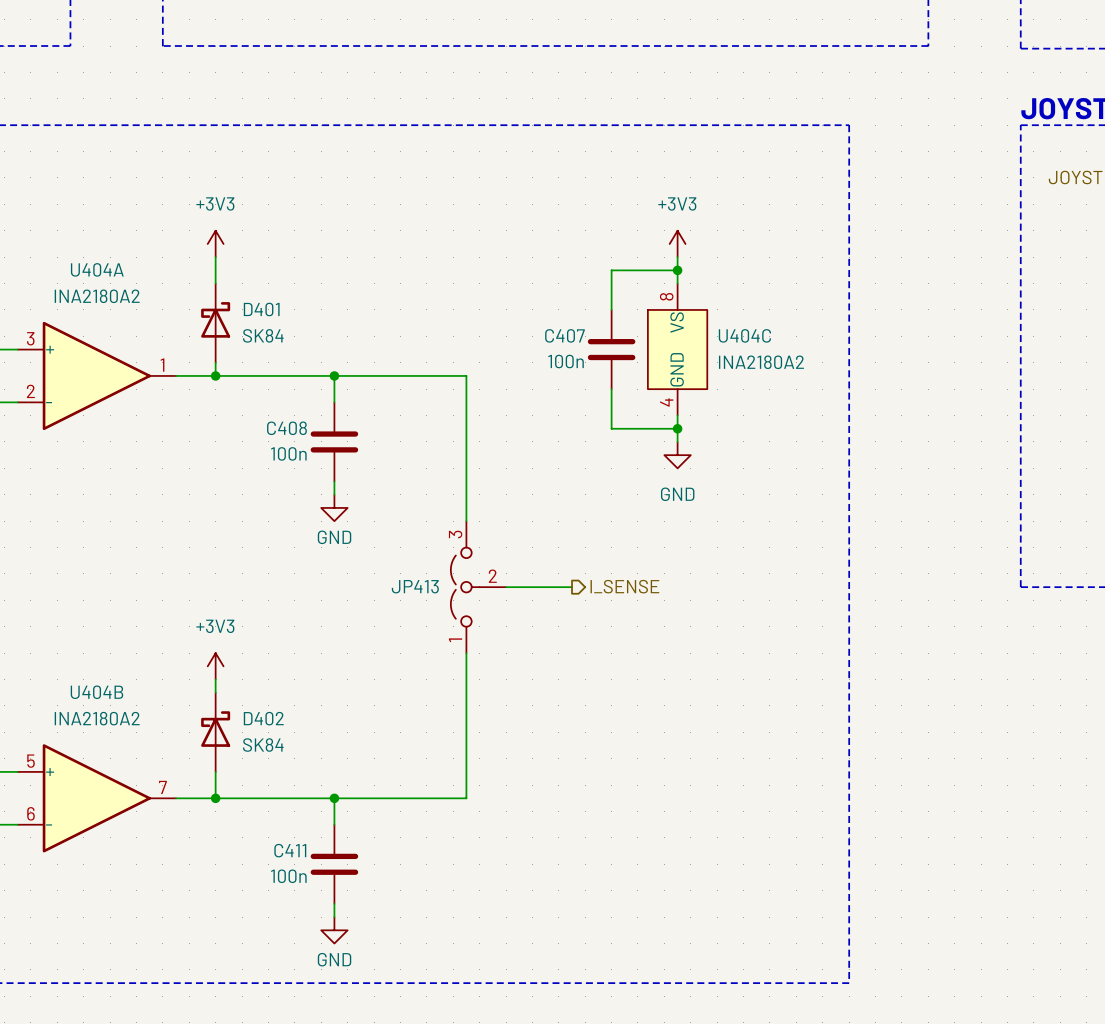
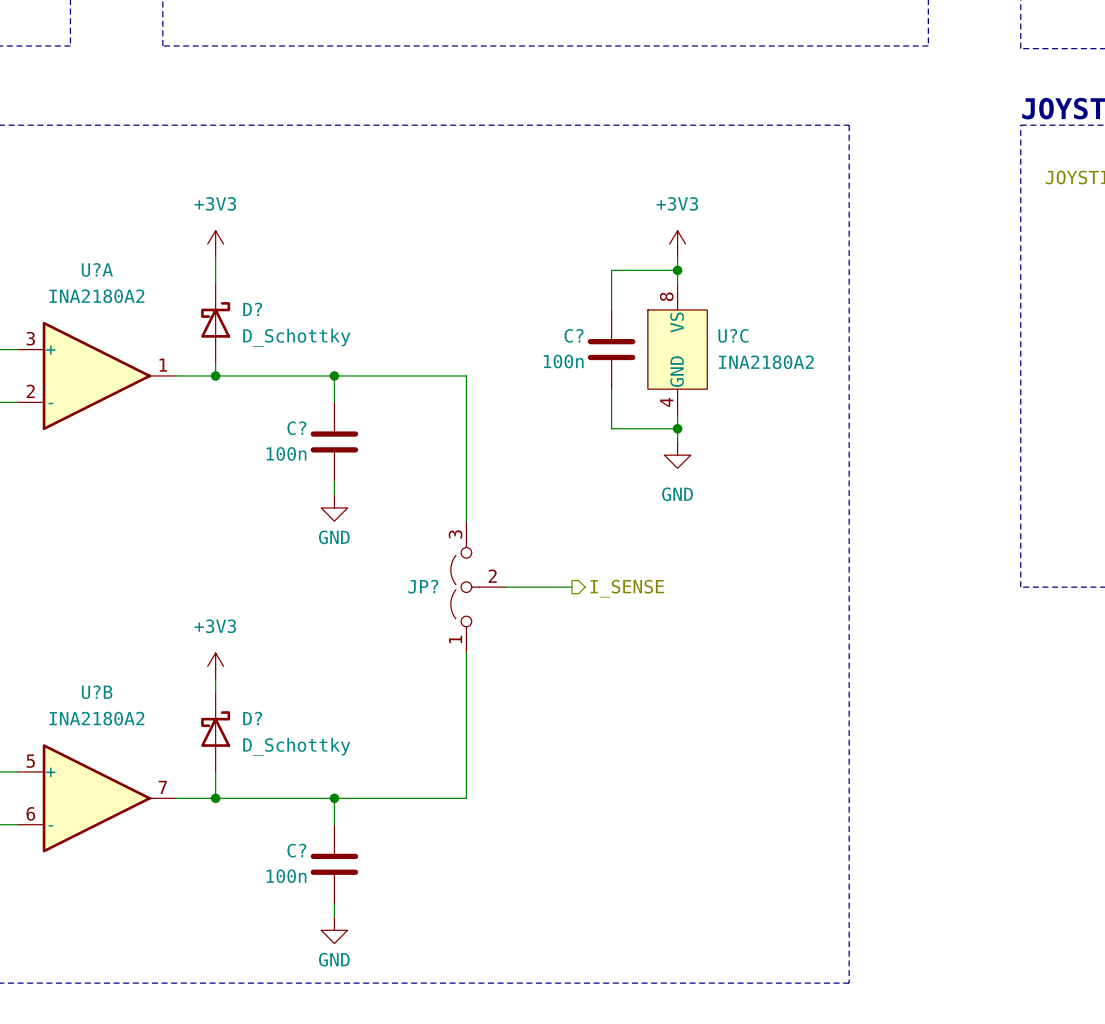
U404A name: U404A (97, 269) -> U?A (97, 269)
D401 name: D401 (261, 309) -> D? (252, 309)
D401 value: SK84 (263, 335) -> D_Schottky (296, 337)
C407 name: C407 (564, 335) -> C? (574, 335)
U404C name: U404C (744, 335) -> U?C (733, 335)
C408 name: C408 (286, 428) -> C? (296, 428)
JP413 name: JP413 (415, 586) -> JP? (423, 586)
U404B name: U404B (96, 692) -> U?B (97, 692)
D402 name: D402 (263, 718) -> D? (252, 718)
D402 value: SK84 (263, 745) -> D_Schottky (296, 746)
C411 name: C411 (290, 850) -> C? (296, 850)

